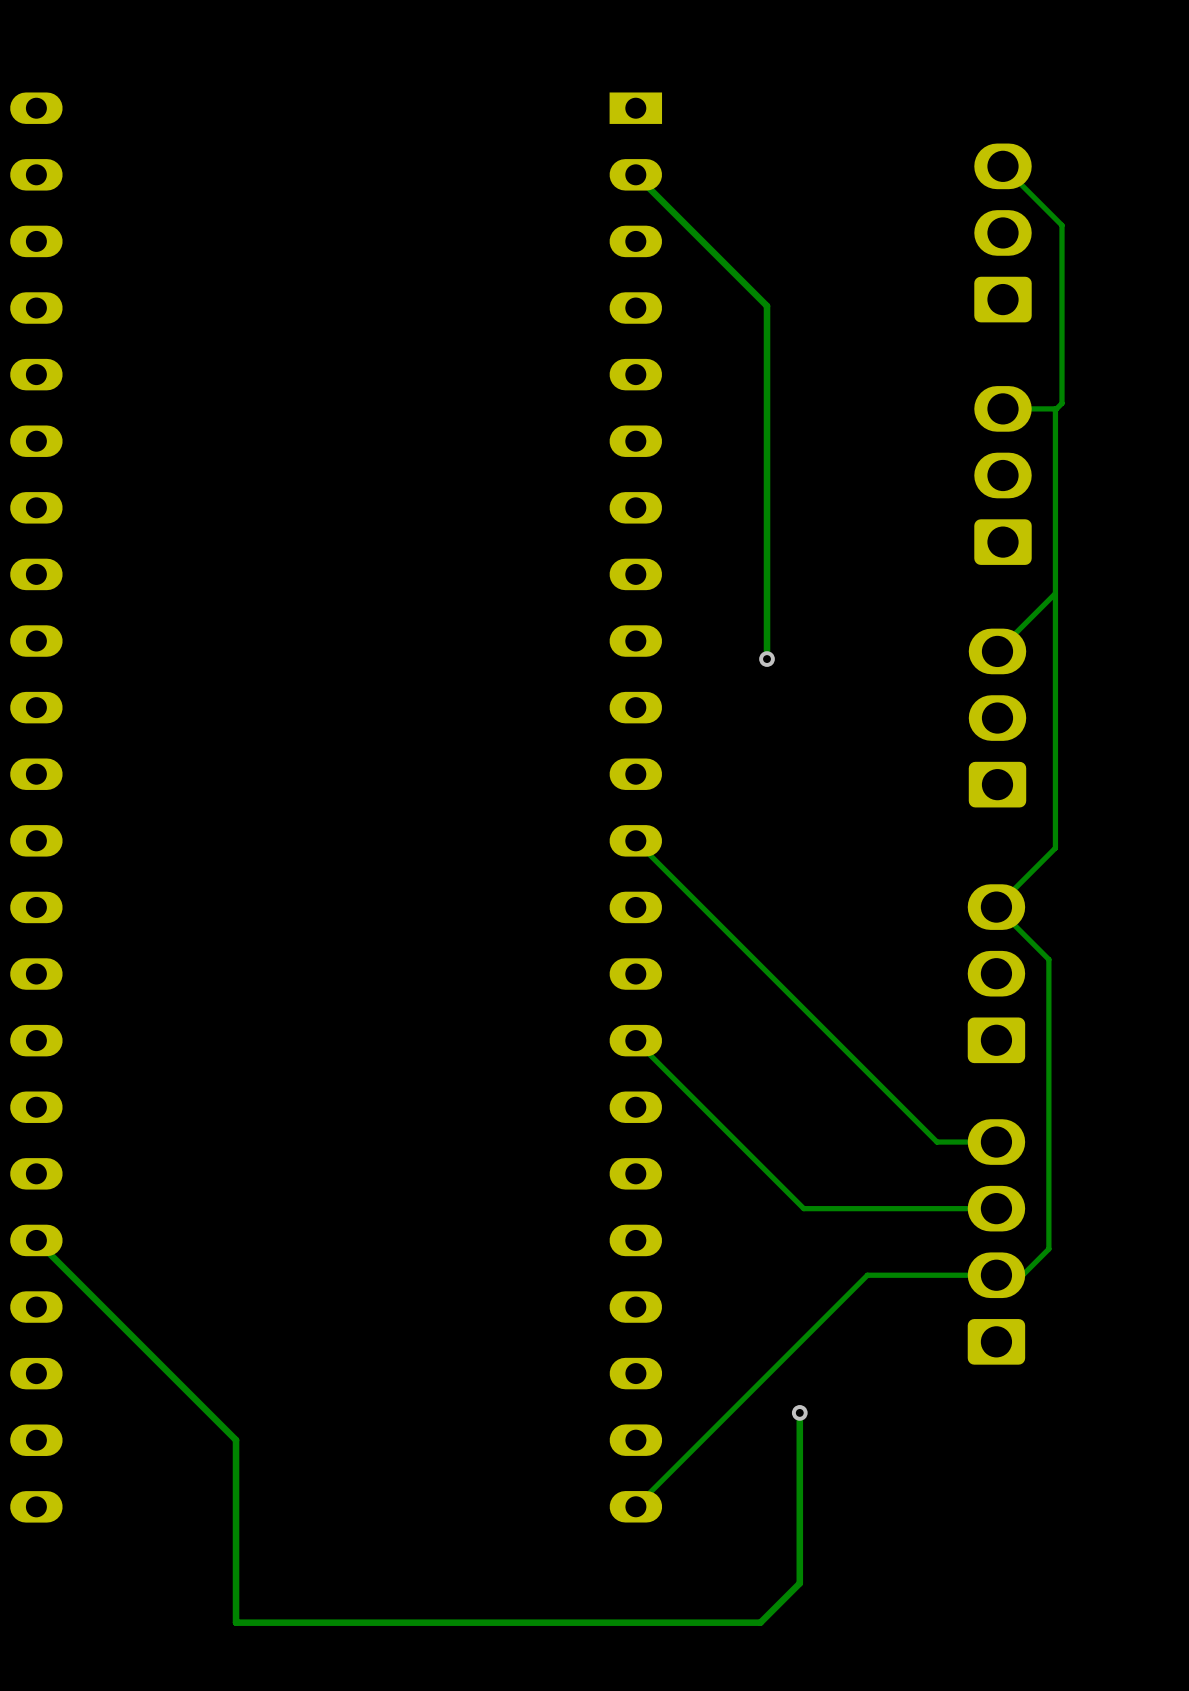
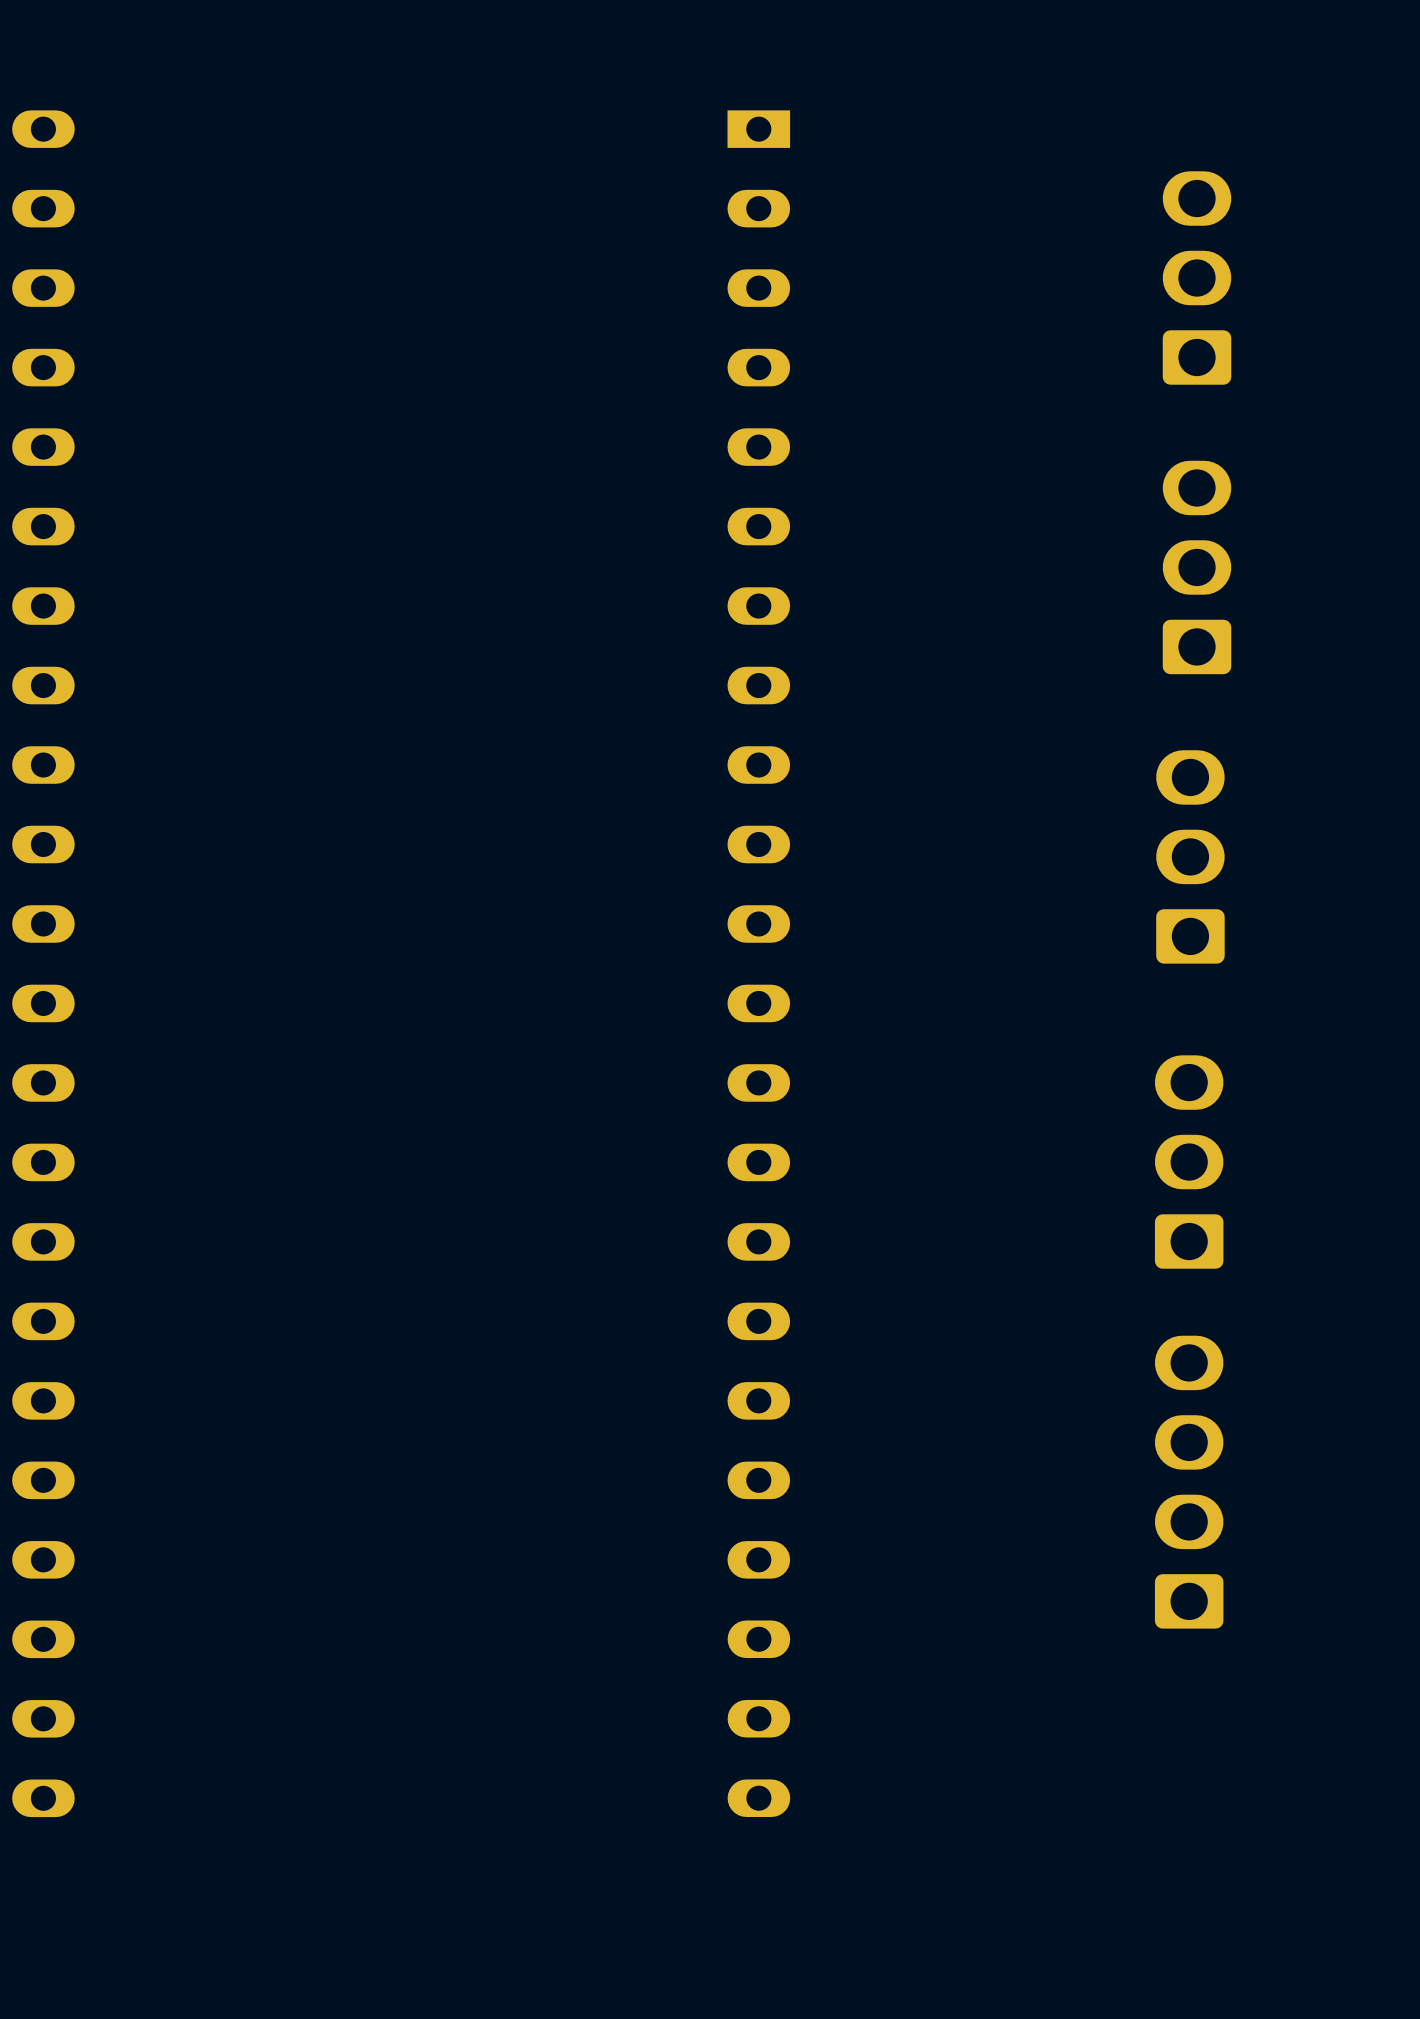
track: (1003, 166) (1062, 225) (1062, 403) (1056, 408) (1003, 408) -> none
track: (635, 174) (767, 306) (767, 659) -> none
track: (1055, 408) (1055, 848) (996, 907) (1048, 959) (1048, 1249) (1022, 1275) (867, 1275) (635, 1506) -> none
track: (1055, 593) (997, 651) -> none
via: (767, 659) -> none
track: (635, 840) (937, 1142) (996, 1142) -> none
track: (635, 1040) (803, 1208) (996, 1208) -> none
track: (36, 1240) (236, 1440) (236, 1622) (760, 1622) (799, 1583) (799, 1412) -> none
via: (799, 1412) -> none

